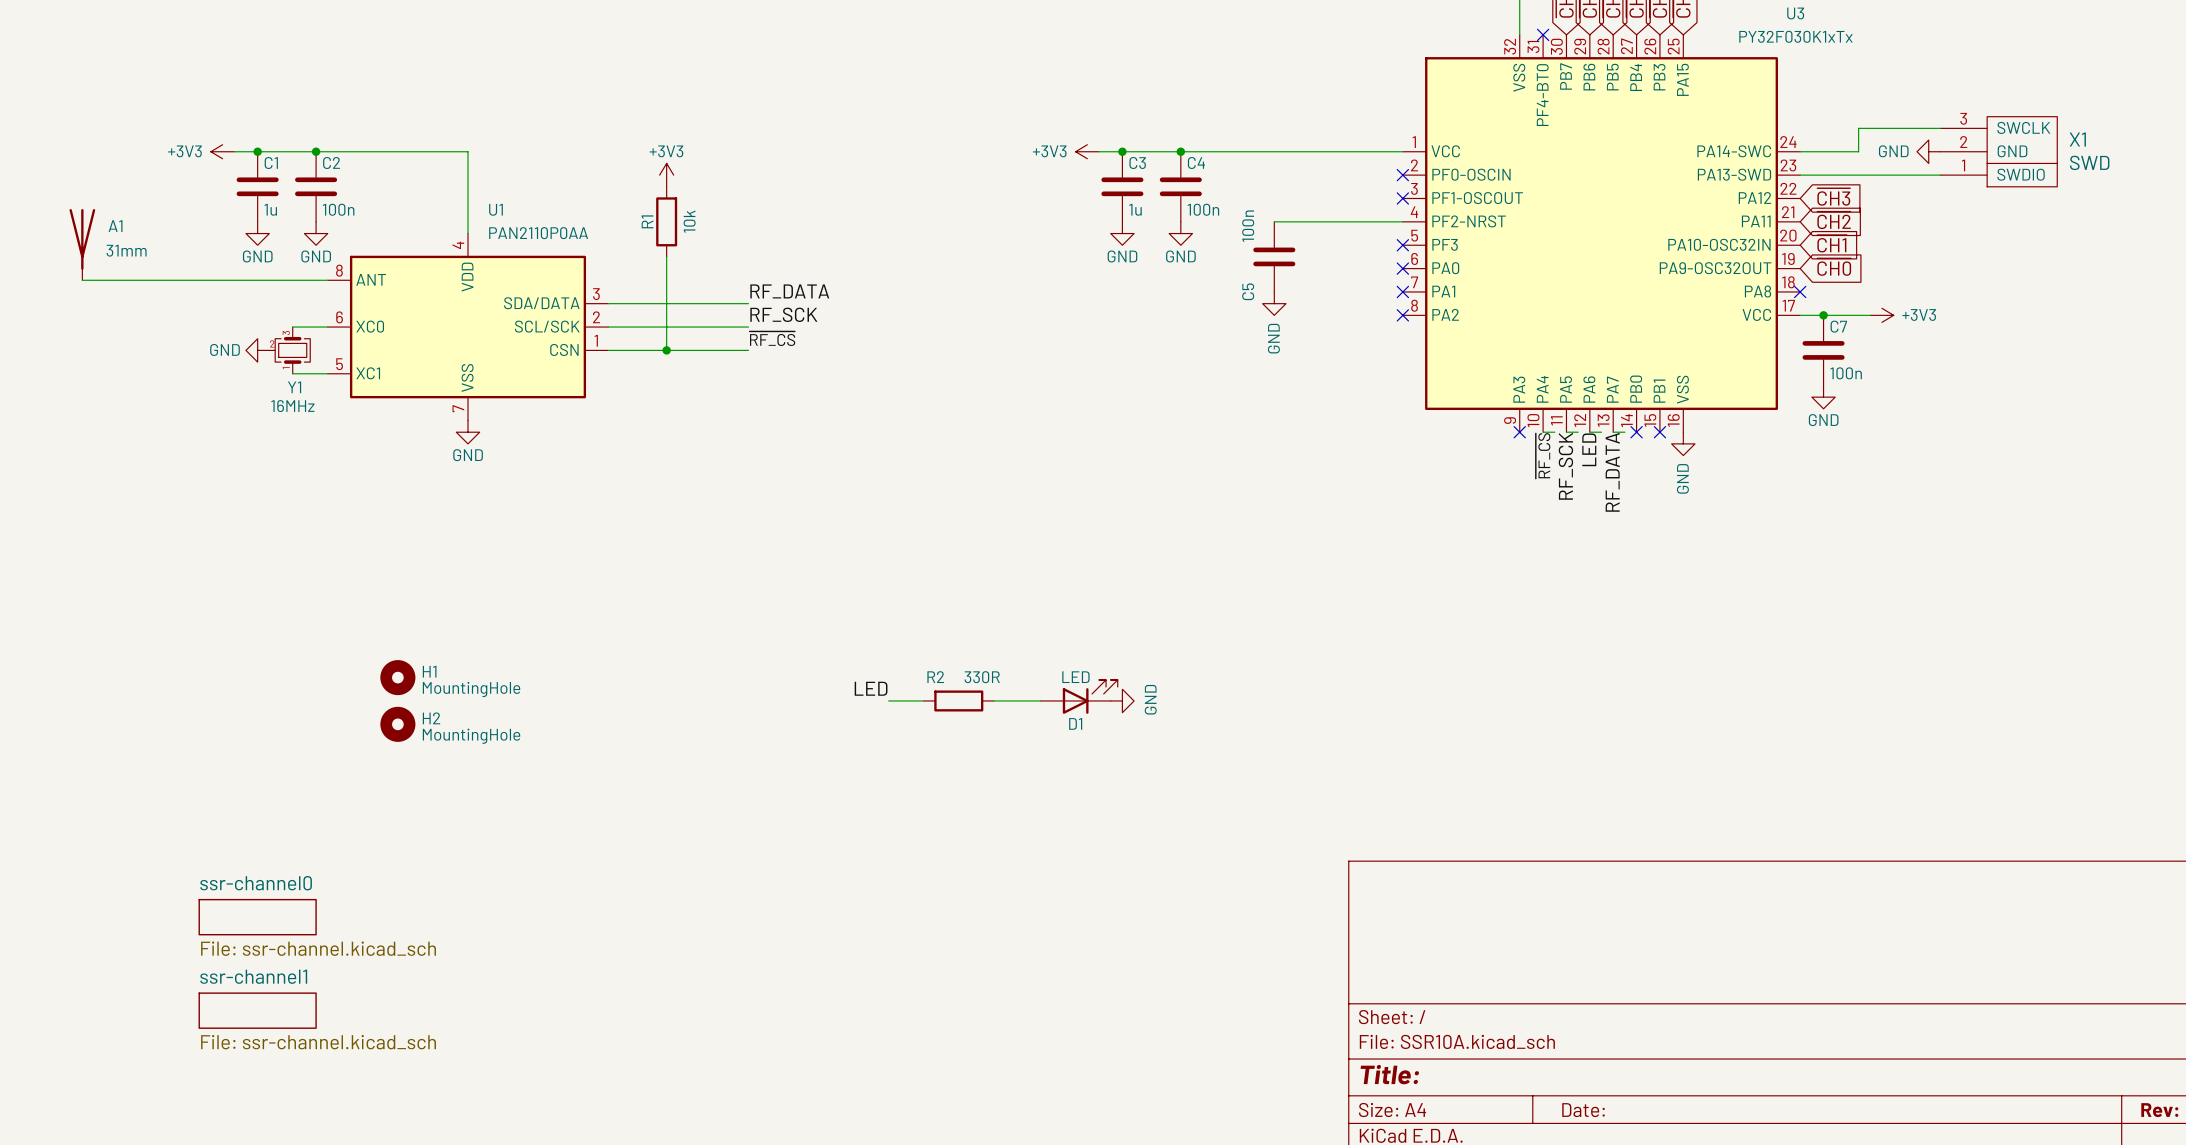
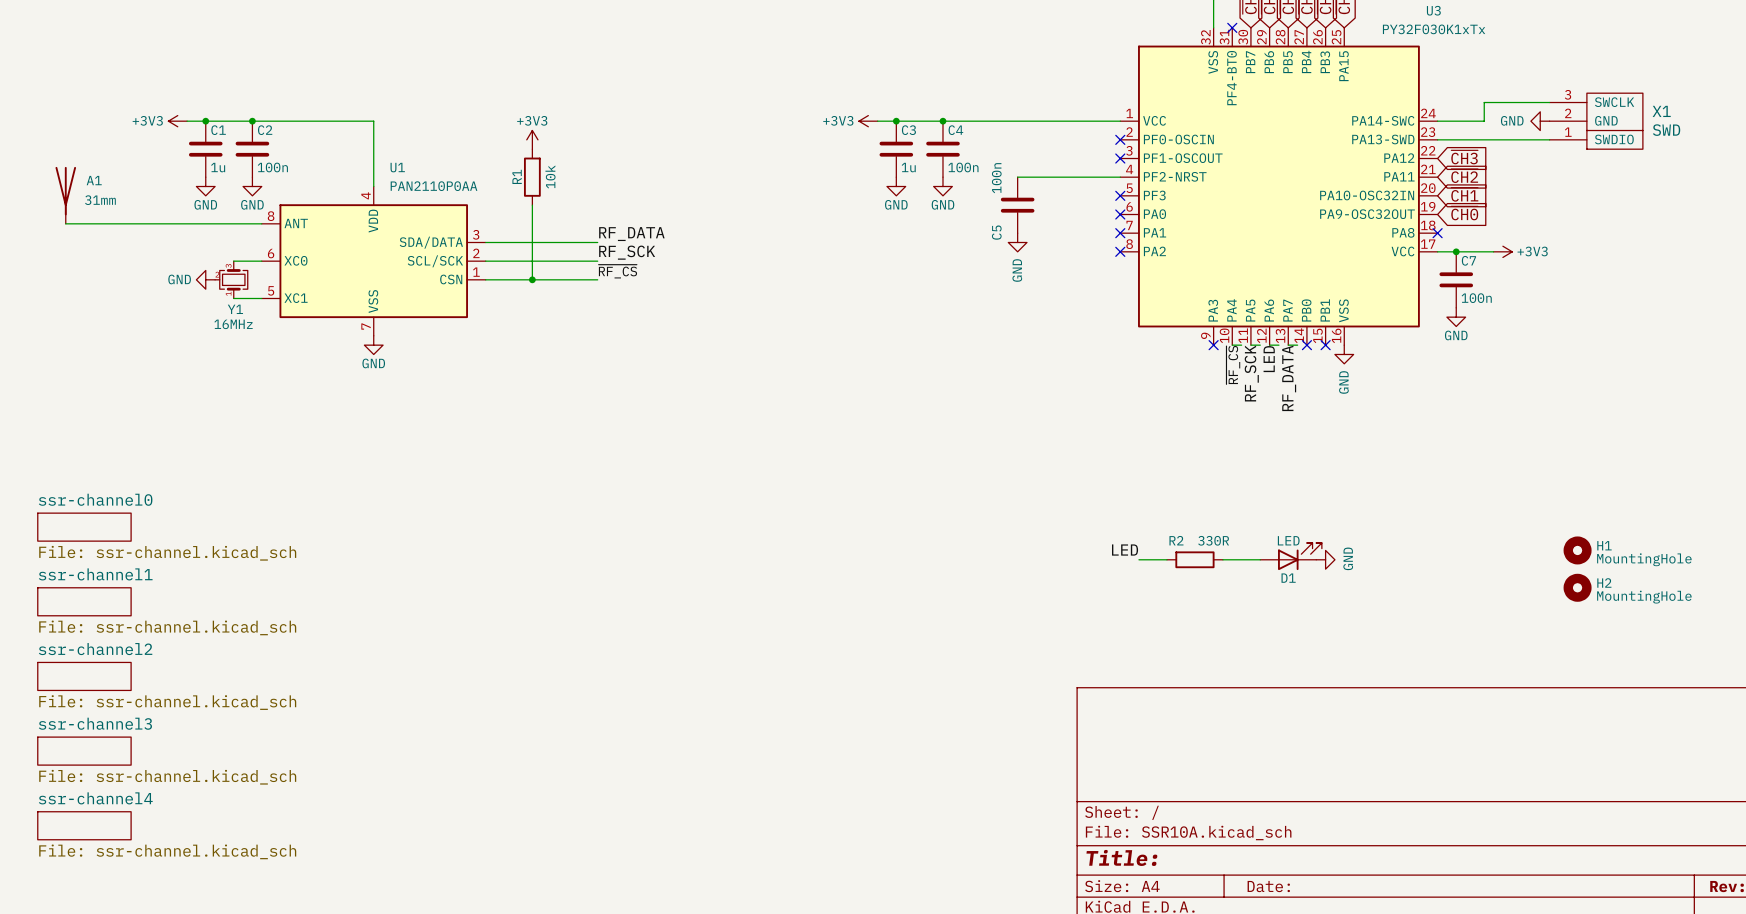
H1 position: (397, 677) -> (1577, 550)
label: LED (871, 688) -> none
label: none -> LED (1125, 550)
D1 position: (1079, 696) -> (1291, 556)
wire: (888, 700) (923, 700) -> none
R2 position: (958, 700) -> (1194, 559)
wire: (993, 700) (1040, 700) -> none
power symbol: GND (1122, 700) -> none
wire: none -> (1138, 559) (1166, 559)
wire: none -> (1222, 559) (1260, 559)
power symbol: none -> GND (1325, 559)
H2 position: (397, 724) -> (1577, 587)
sheet ssr-channel2: none -> File: ssr-channel.kicad_sch (84, 676)
sheet ssr-channel0 position: (257, 917) -> (84, 527)
sheet ssr-channel3: none -> File: ssr-channel.kicad_sch (84, 751)
sheet ssr-channel1 position: (257, 1010) -> (84, 601)
sheet ssr-channel4: none -> File: ssr-channel.kicad_sch (84, 825)

